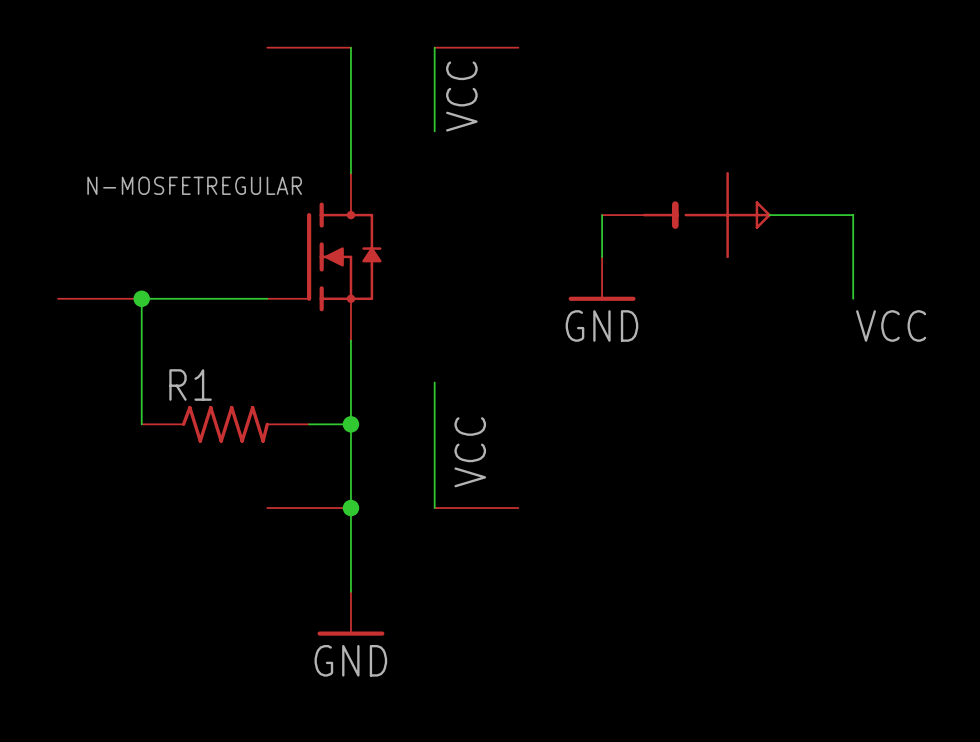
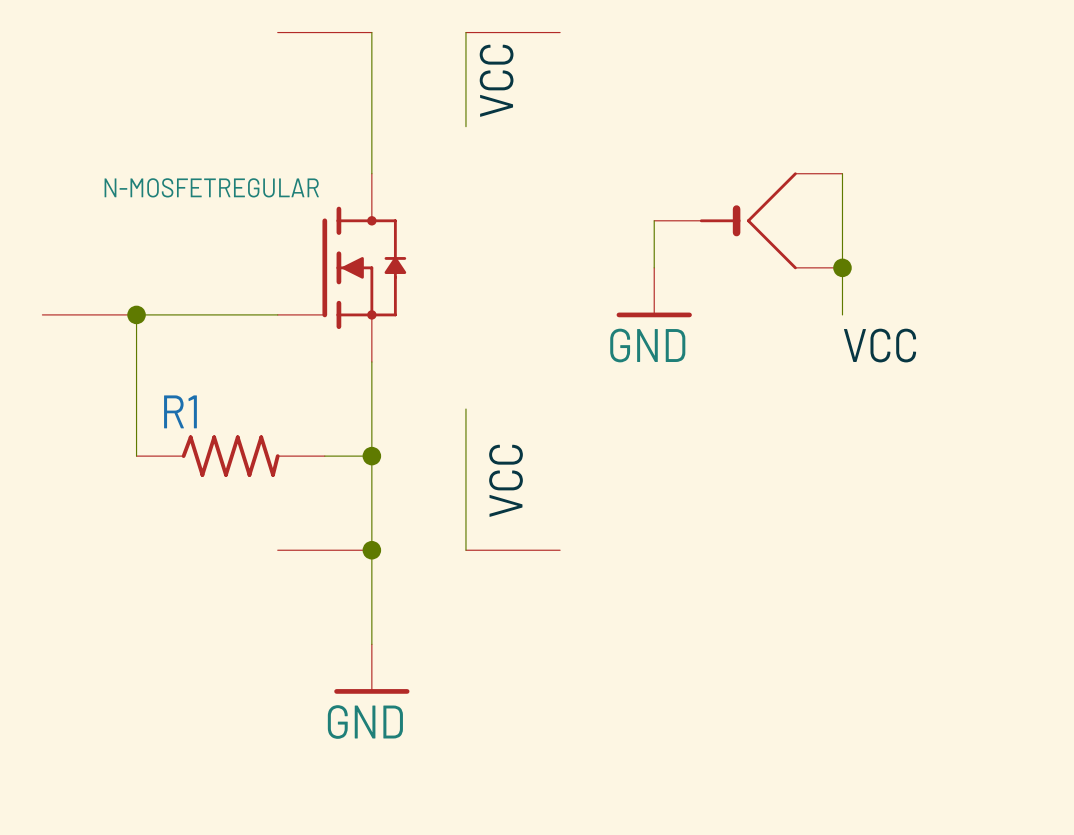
part symbol: [602, 171, 771, 259] -> [654, 172, 843, 270]
wire: none -> (842, 173) (842, 314)
wire: (769, 215) (853, 215) (853, 298) -> none
junction: none -> (842, 267)
label position: VCC (891, 325) -> VCC (880, 345)

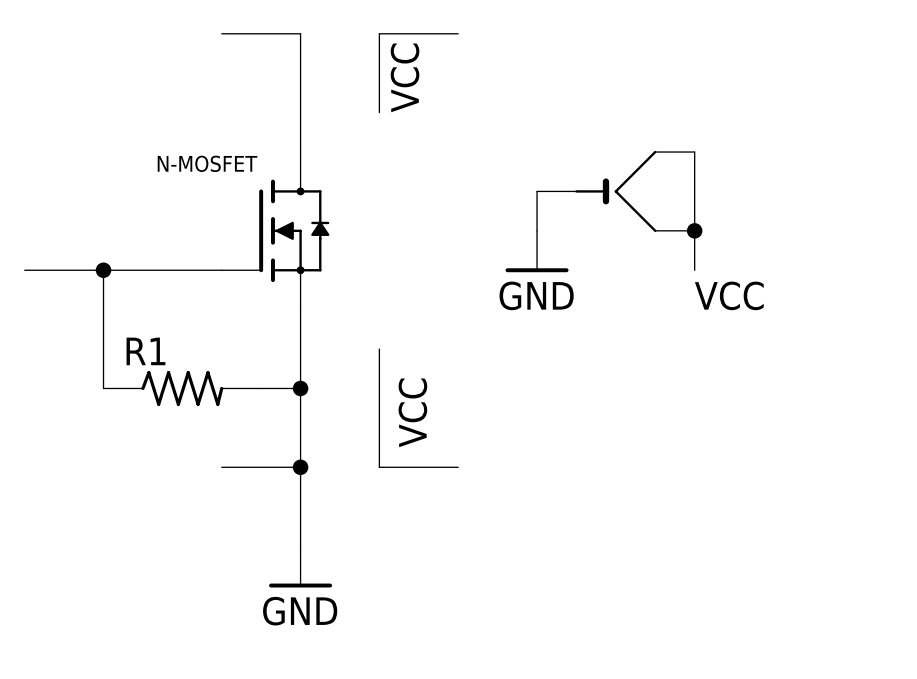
part value: N-MOSFETREGULAR (211, 187) -> N-MOSFET (207, 163)

